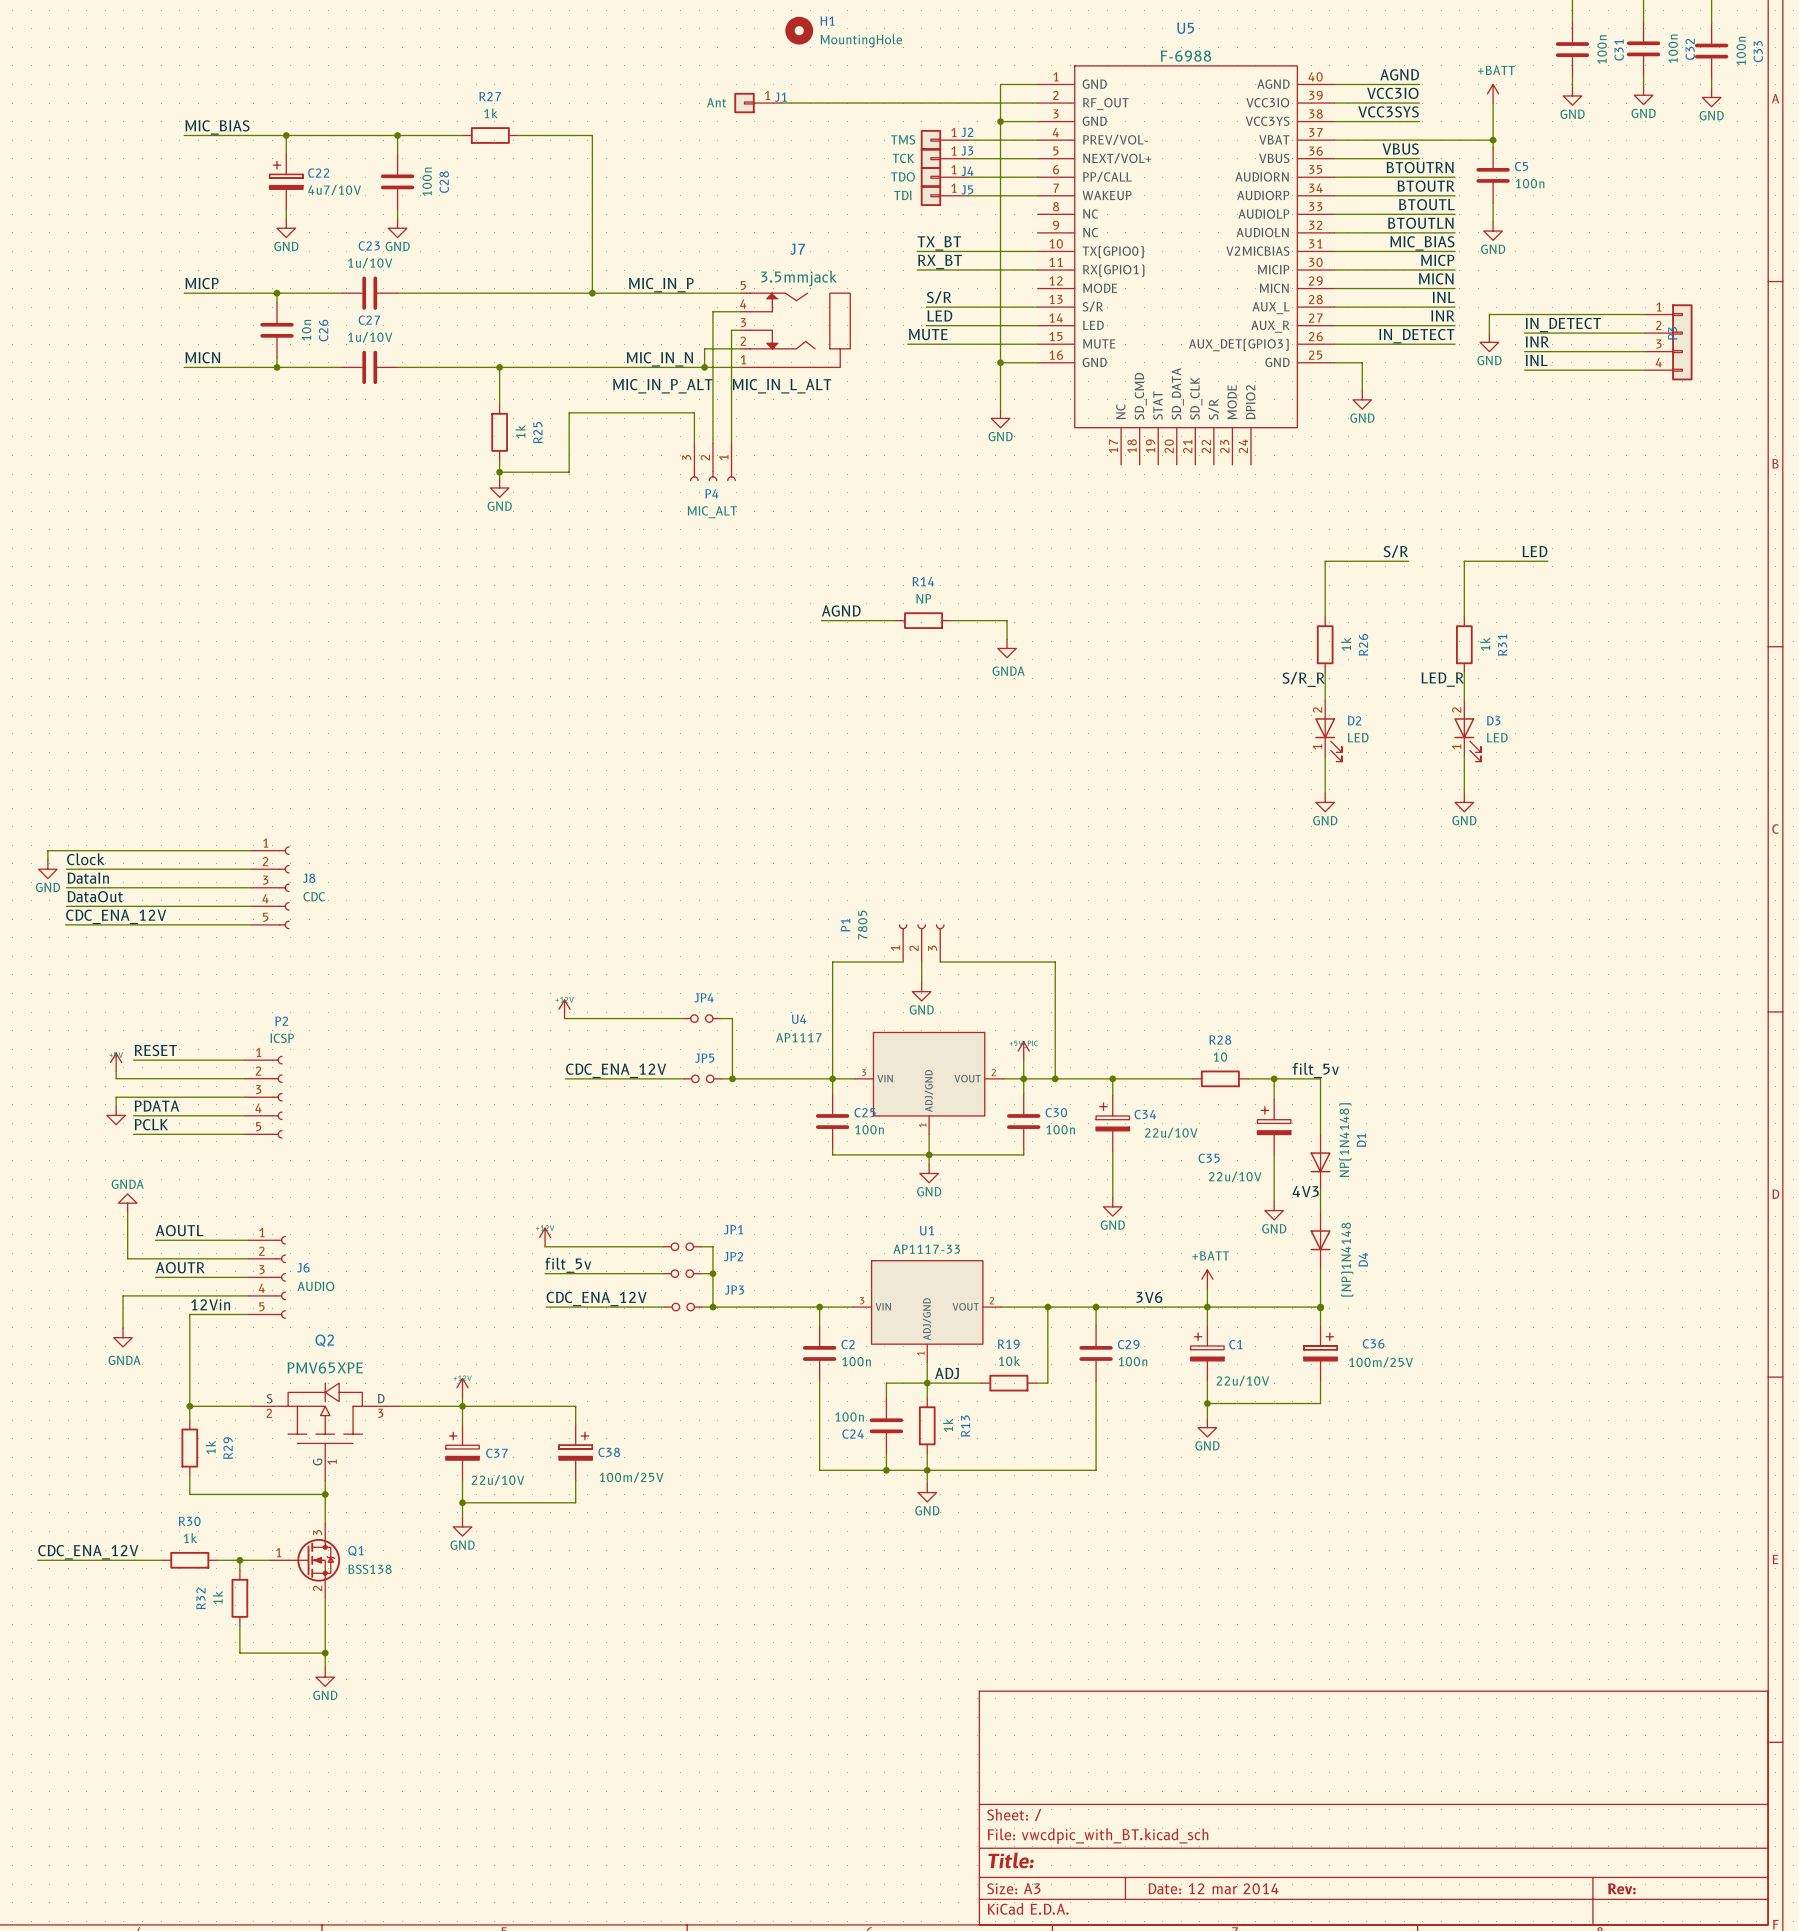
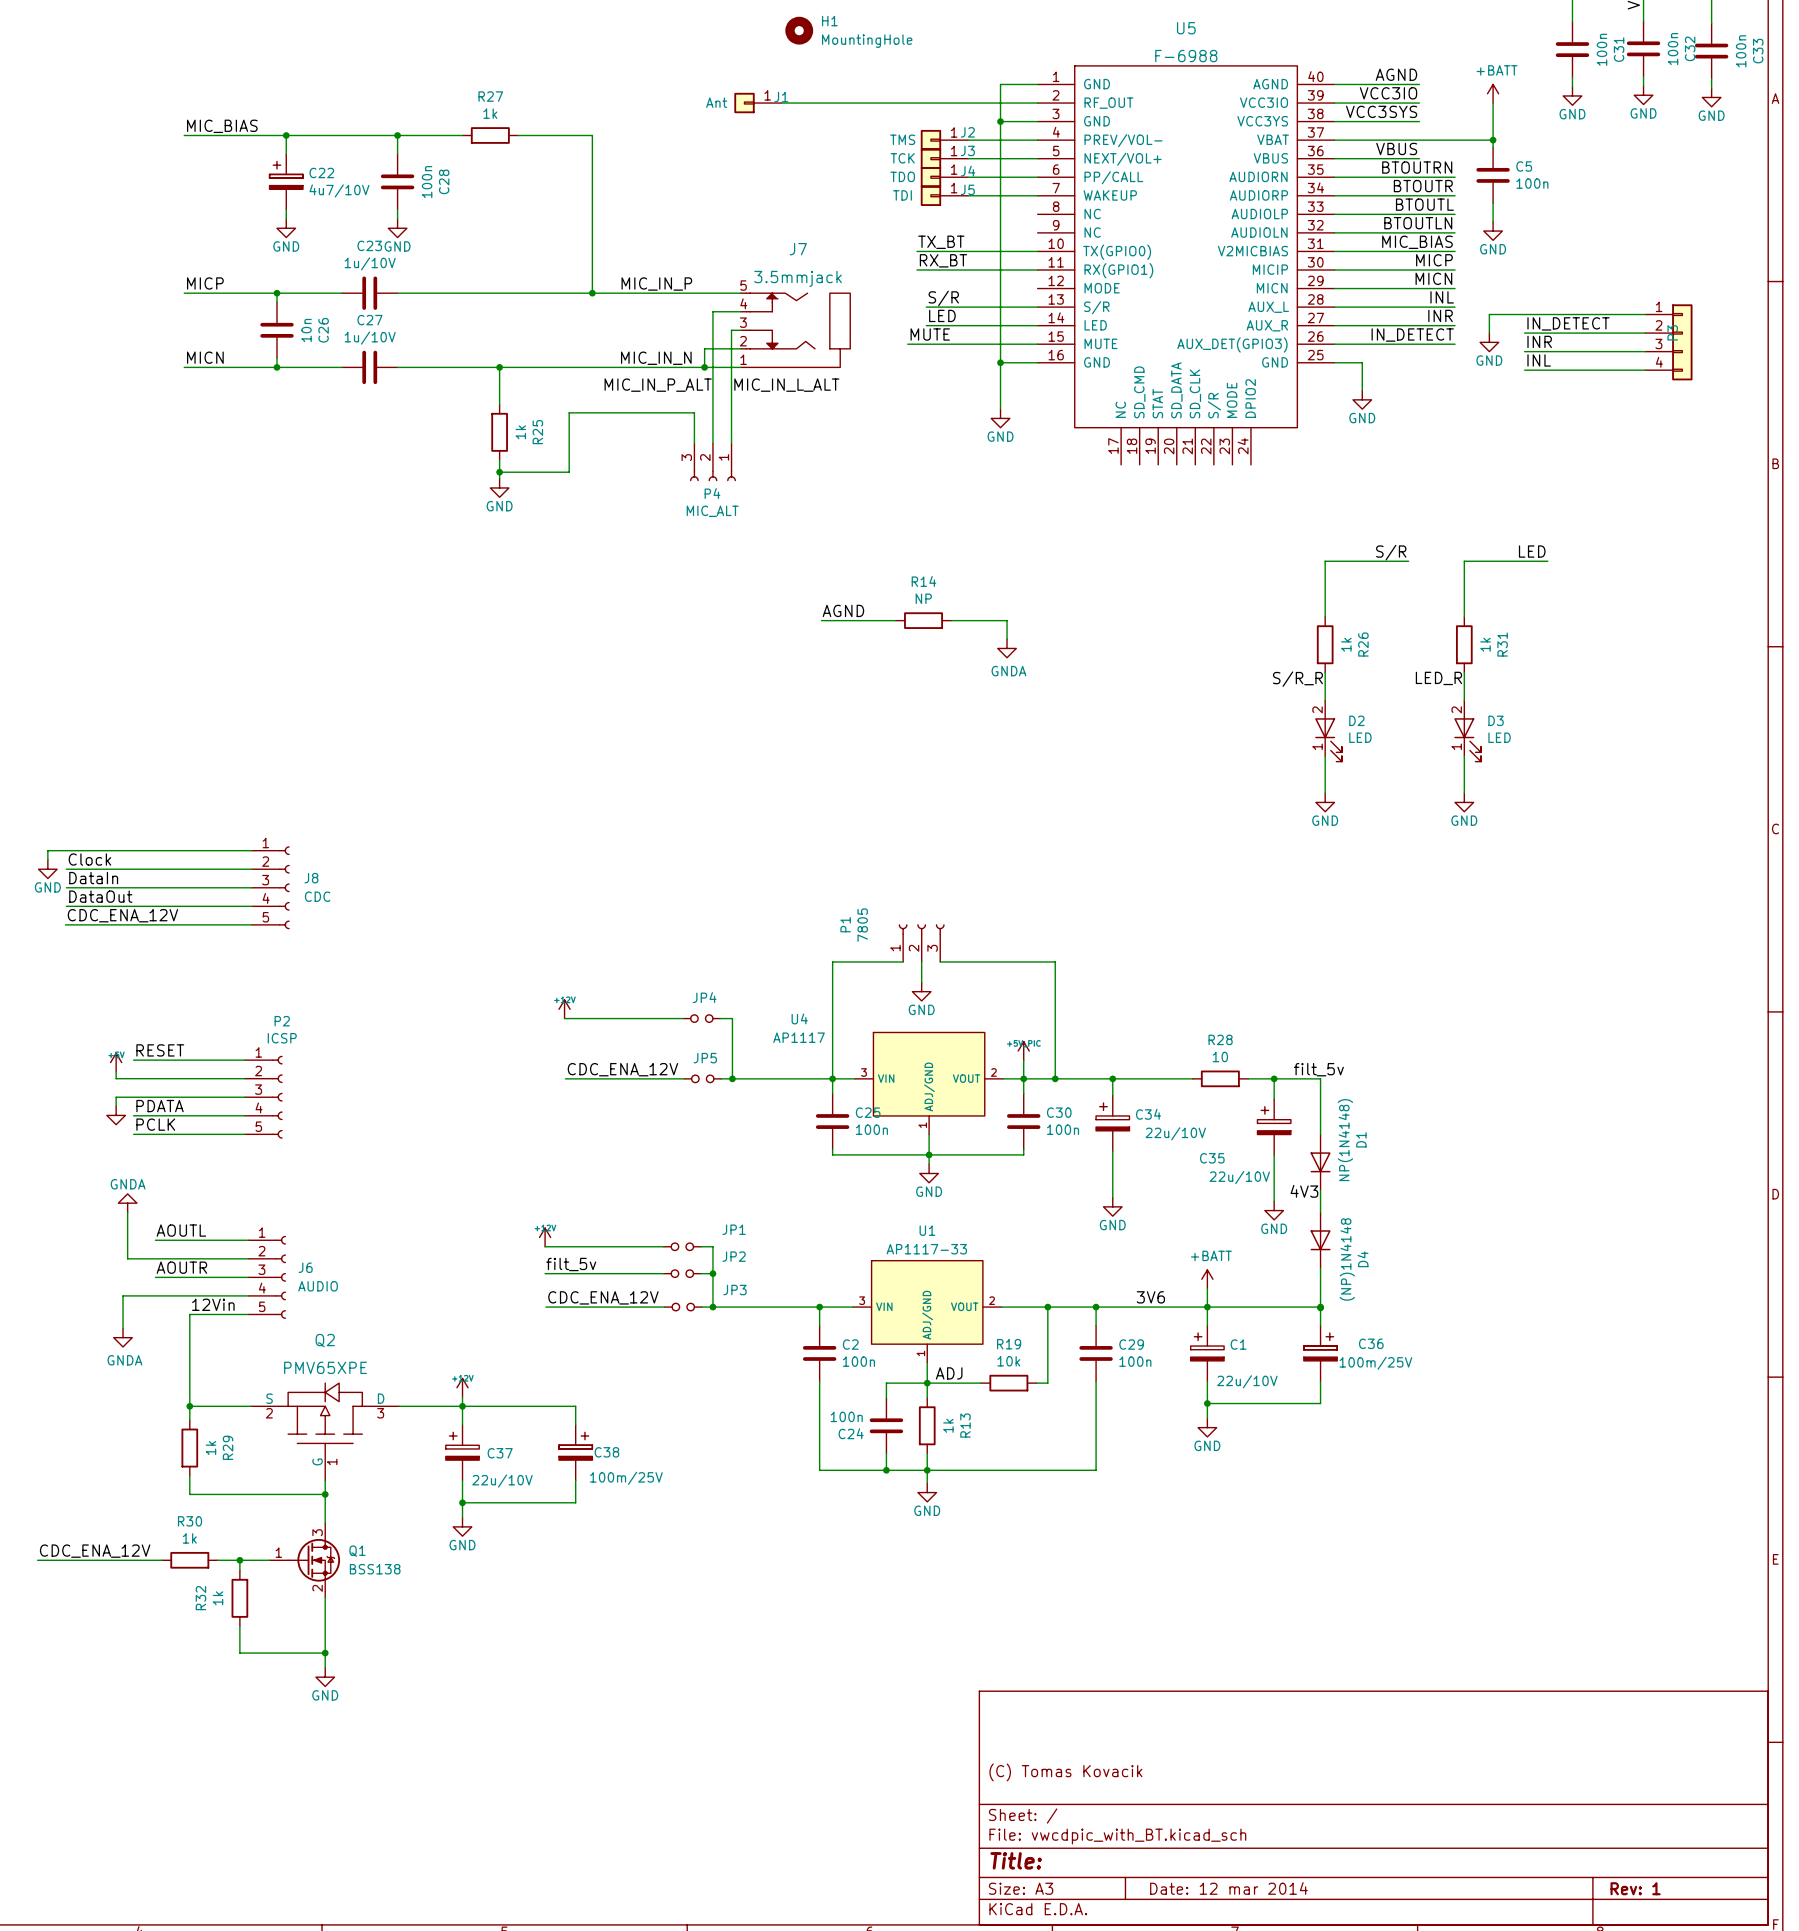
title block: none -> (C) Tomas Kovacik (1065, 1772)
title block: Rev: (1621, 1888) -> Rev: 1 (1635, 1888)

